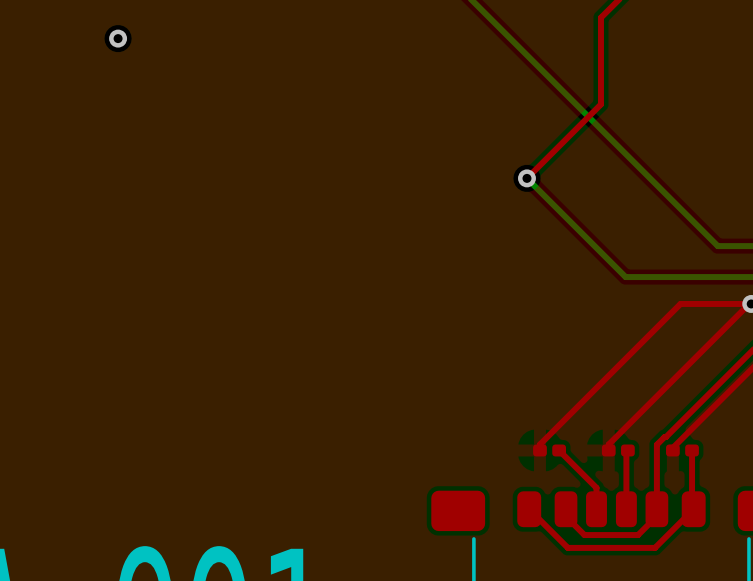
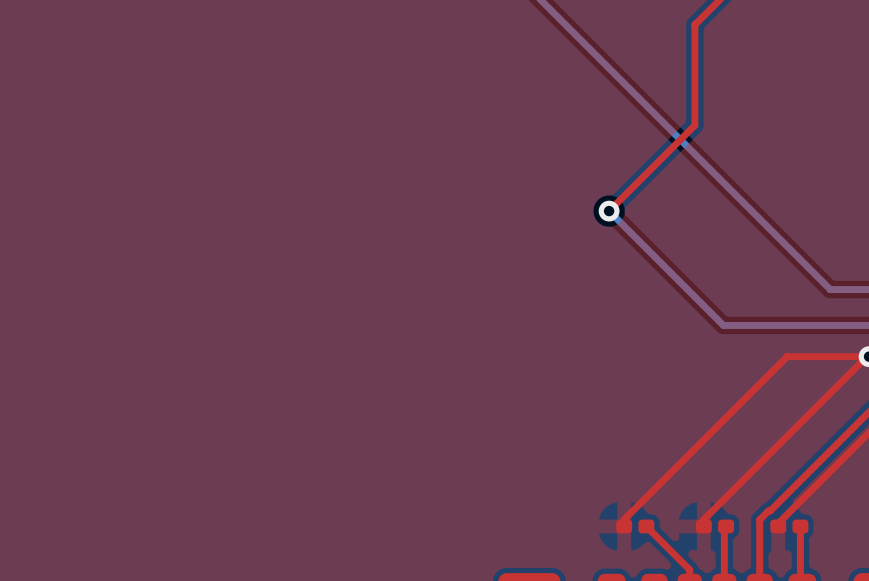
via: (118, 38) -> none

